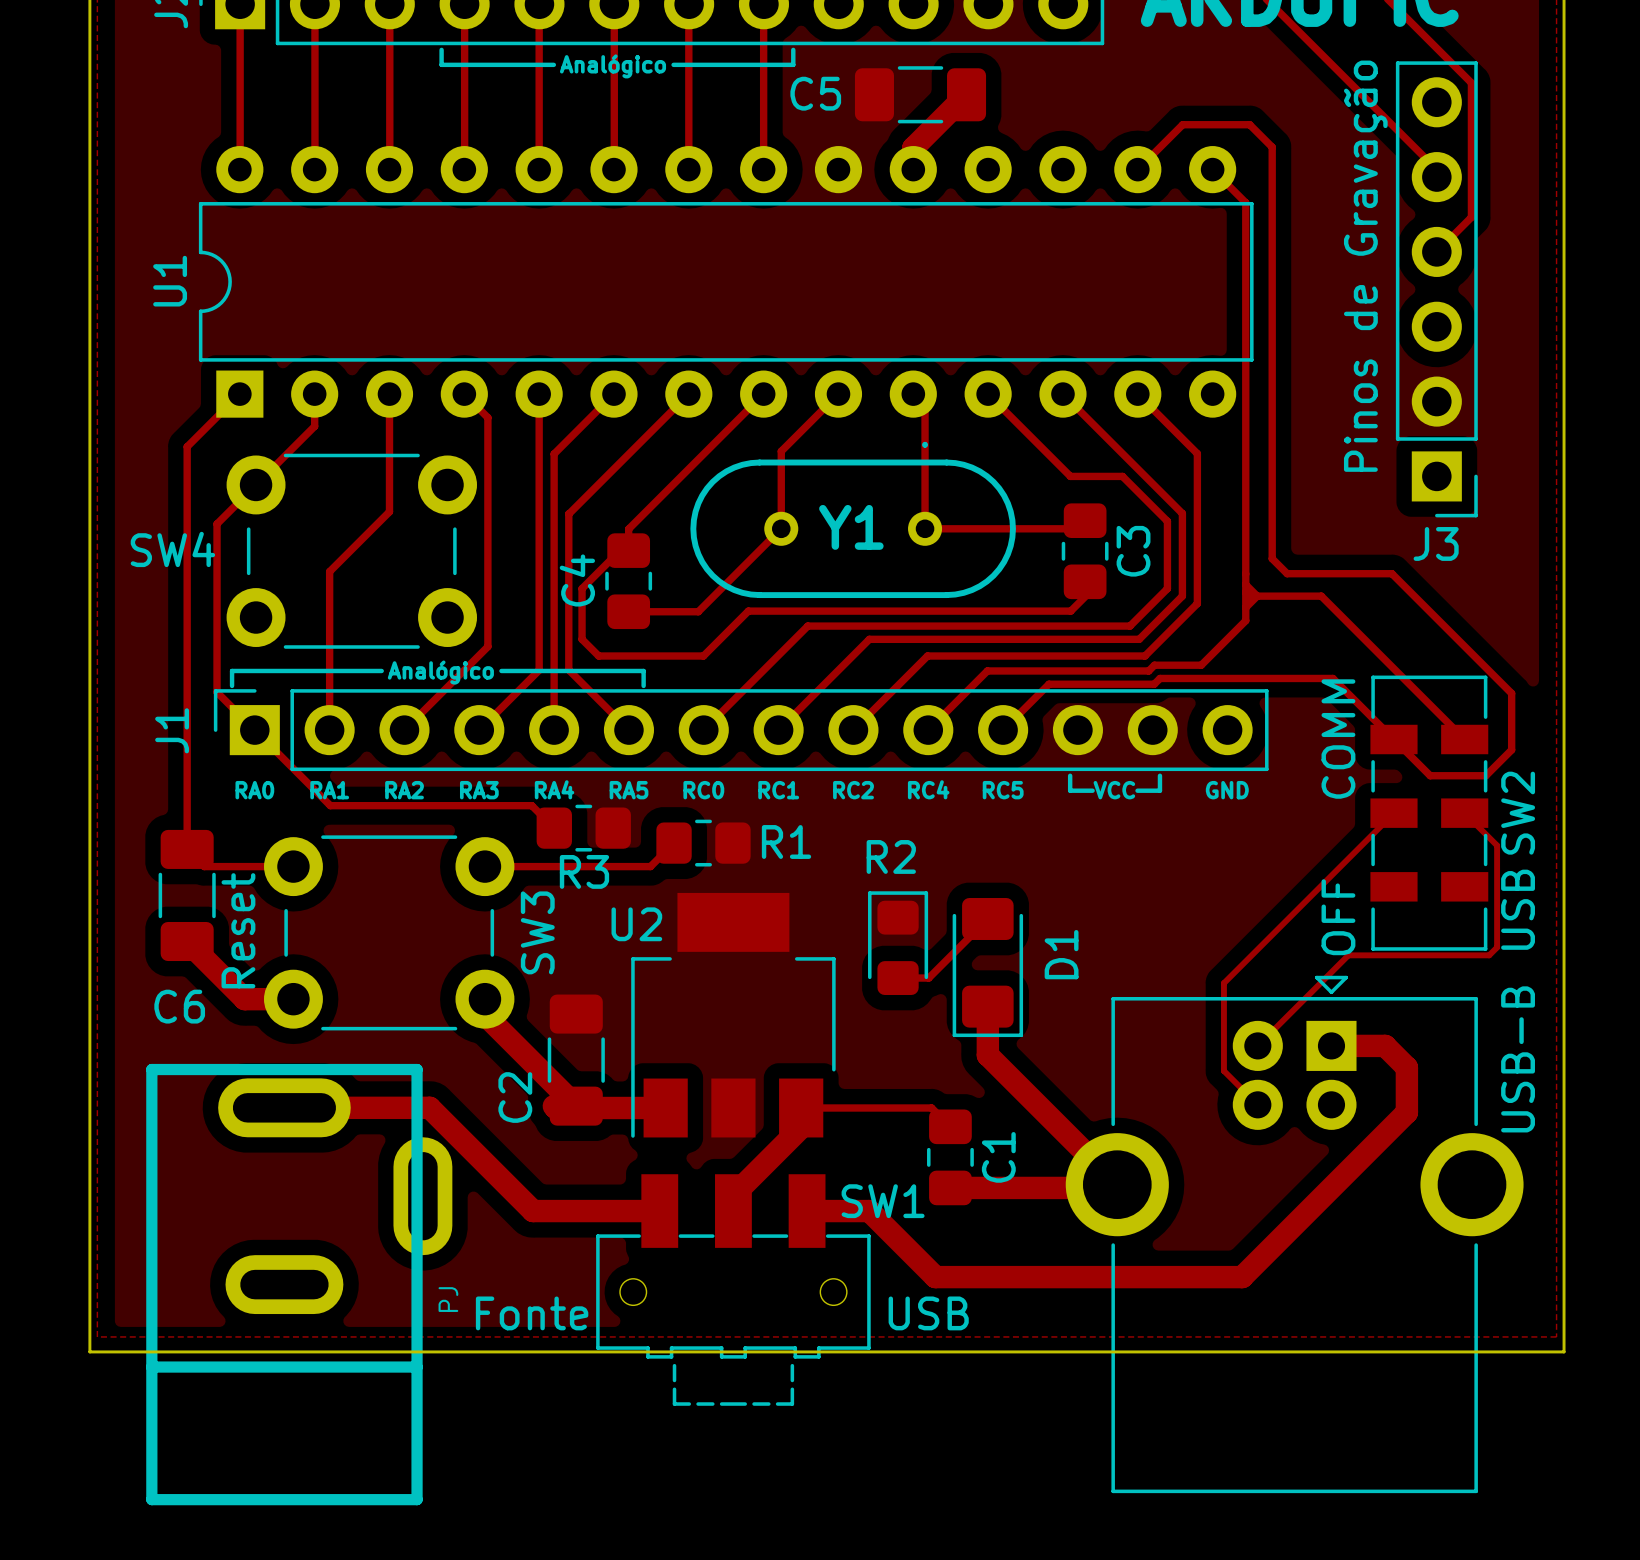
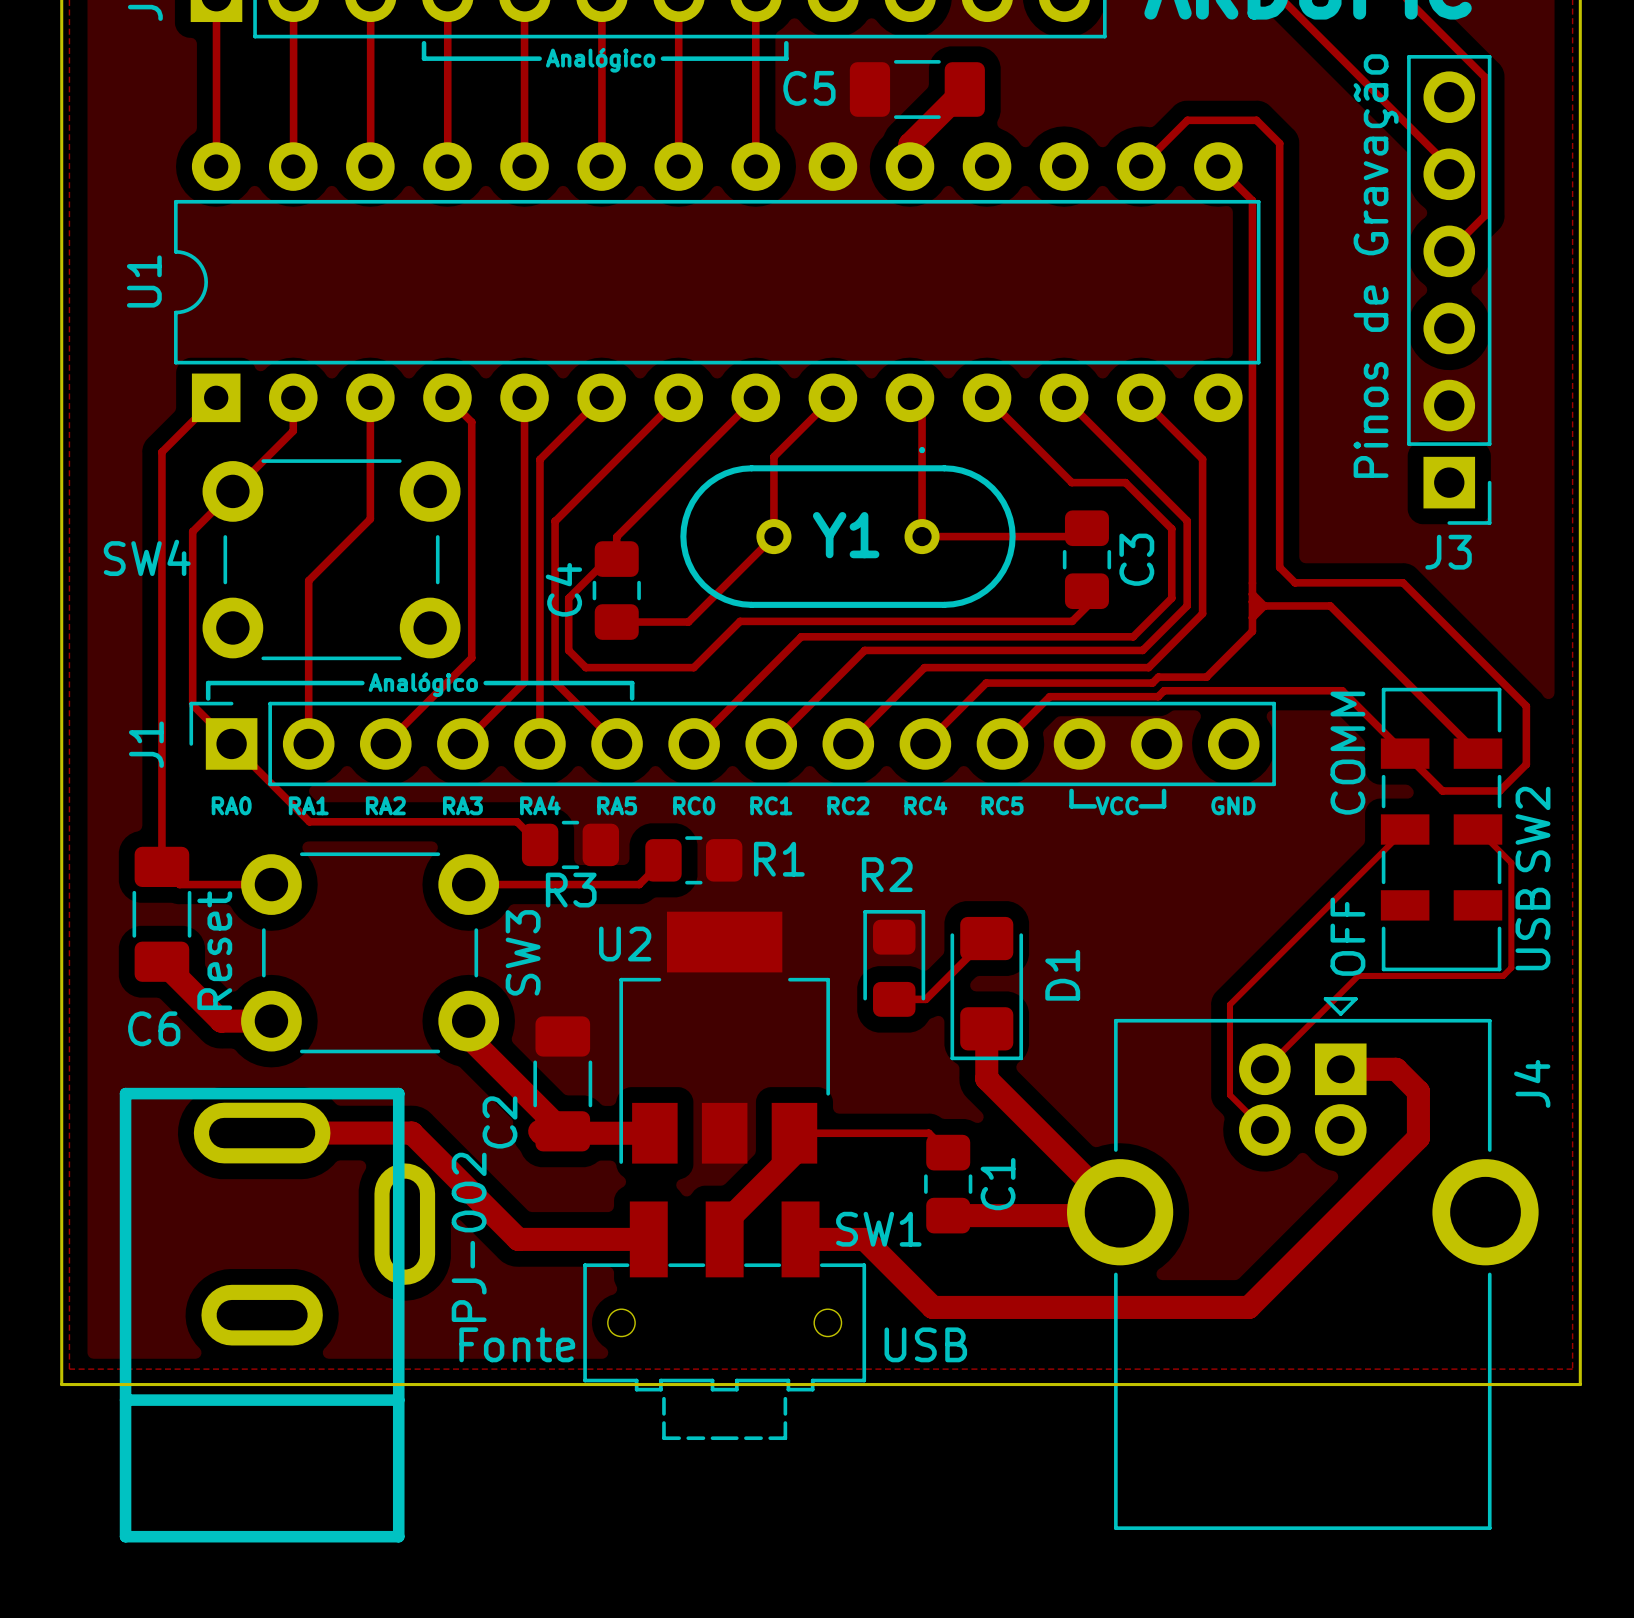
USB-B name: USB-B (1518, 1059) -> J4 (1532, 1083)
PJ name: PJ (448, 1299) -> PJ-002 (469, 1237)

